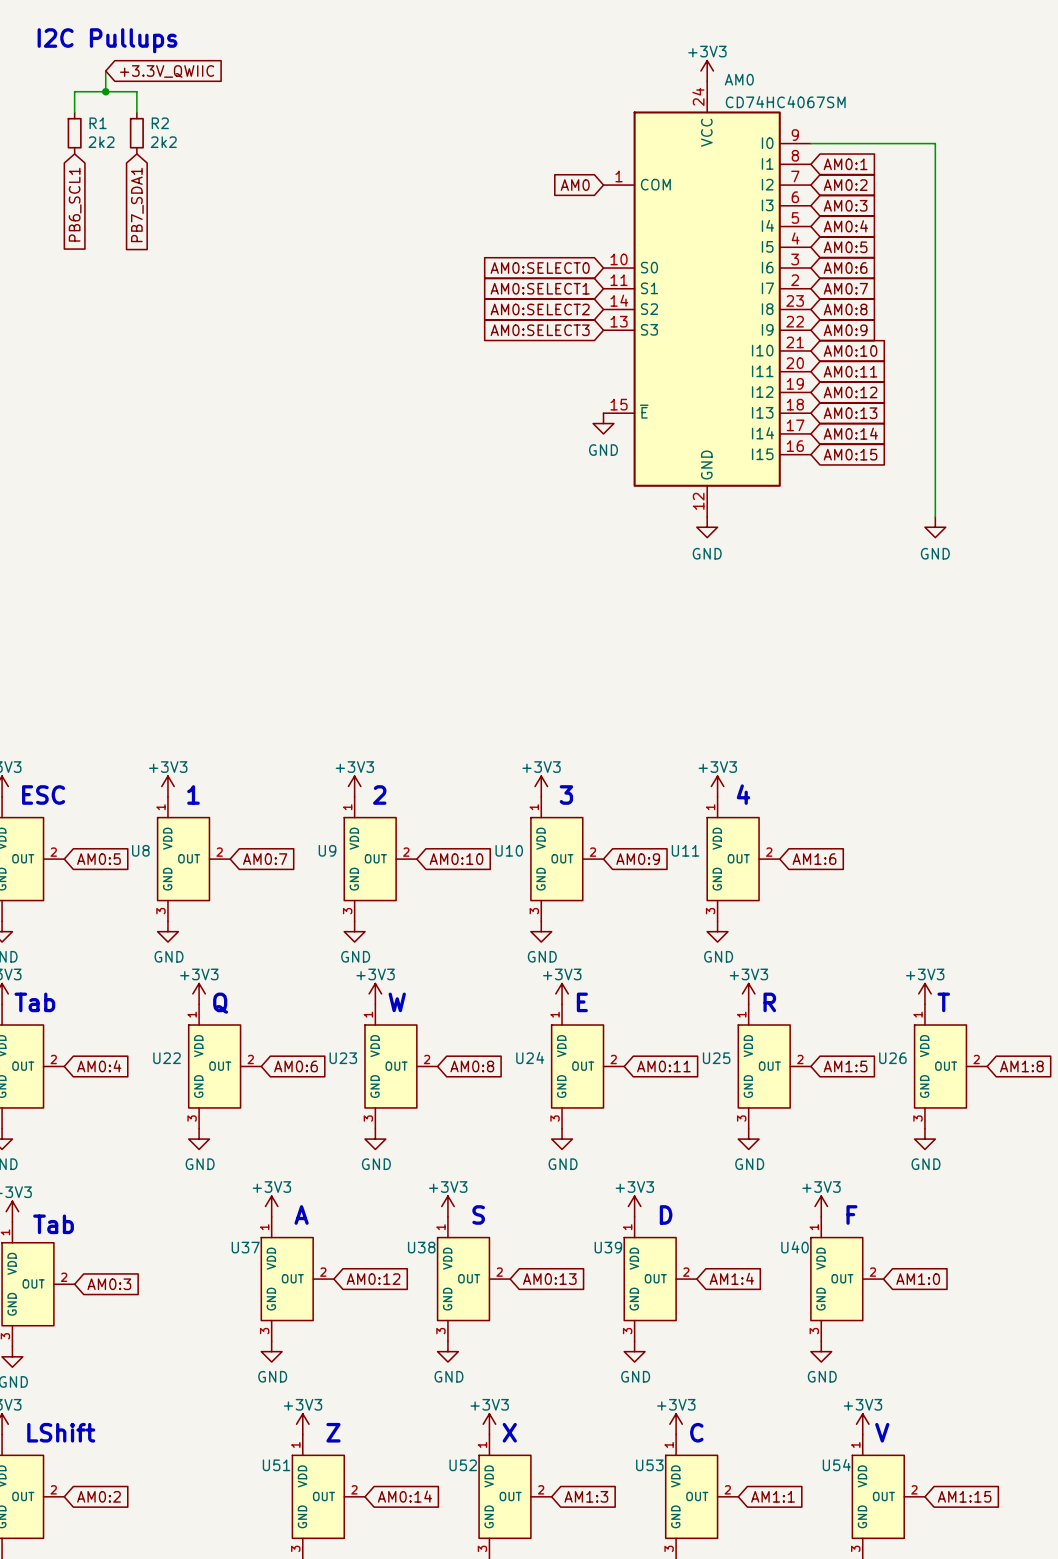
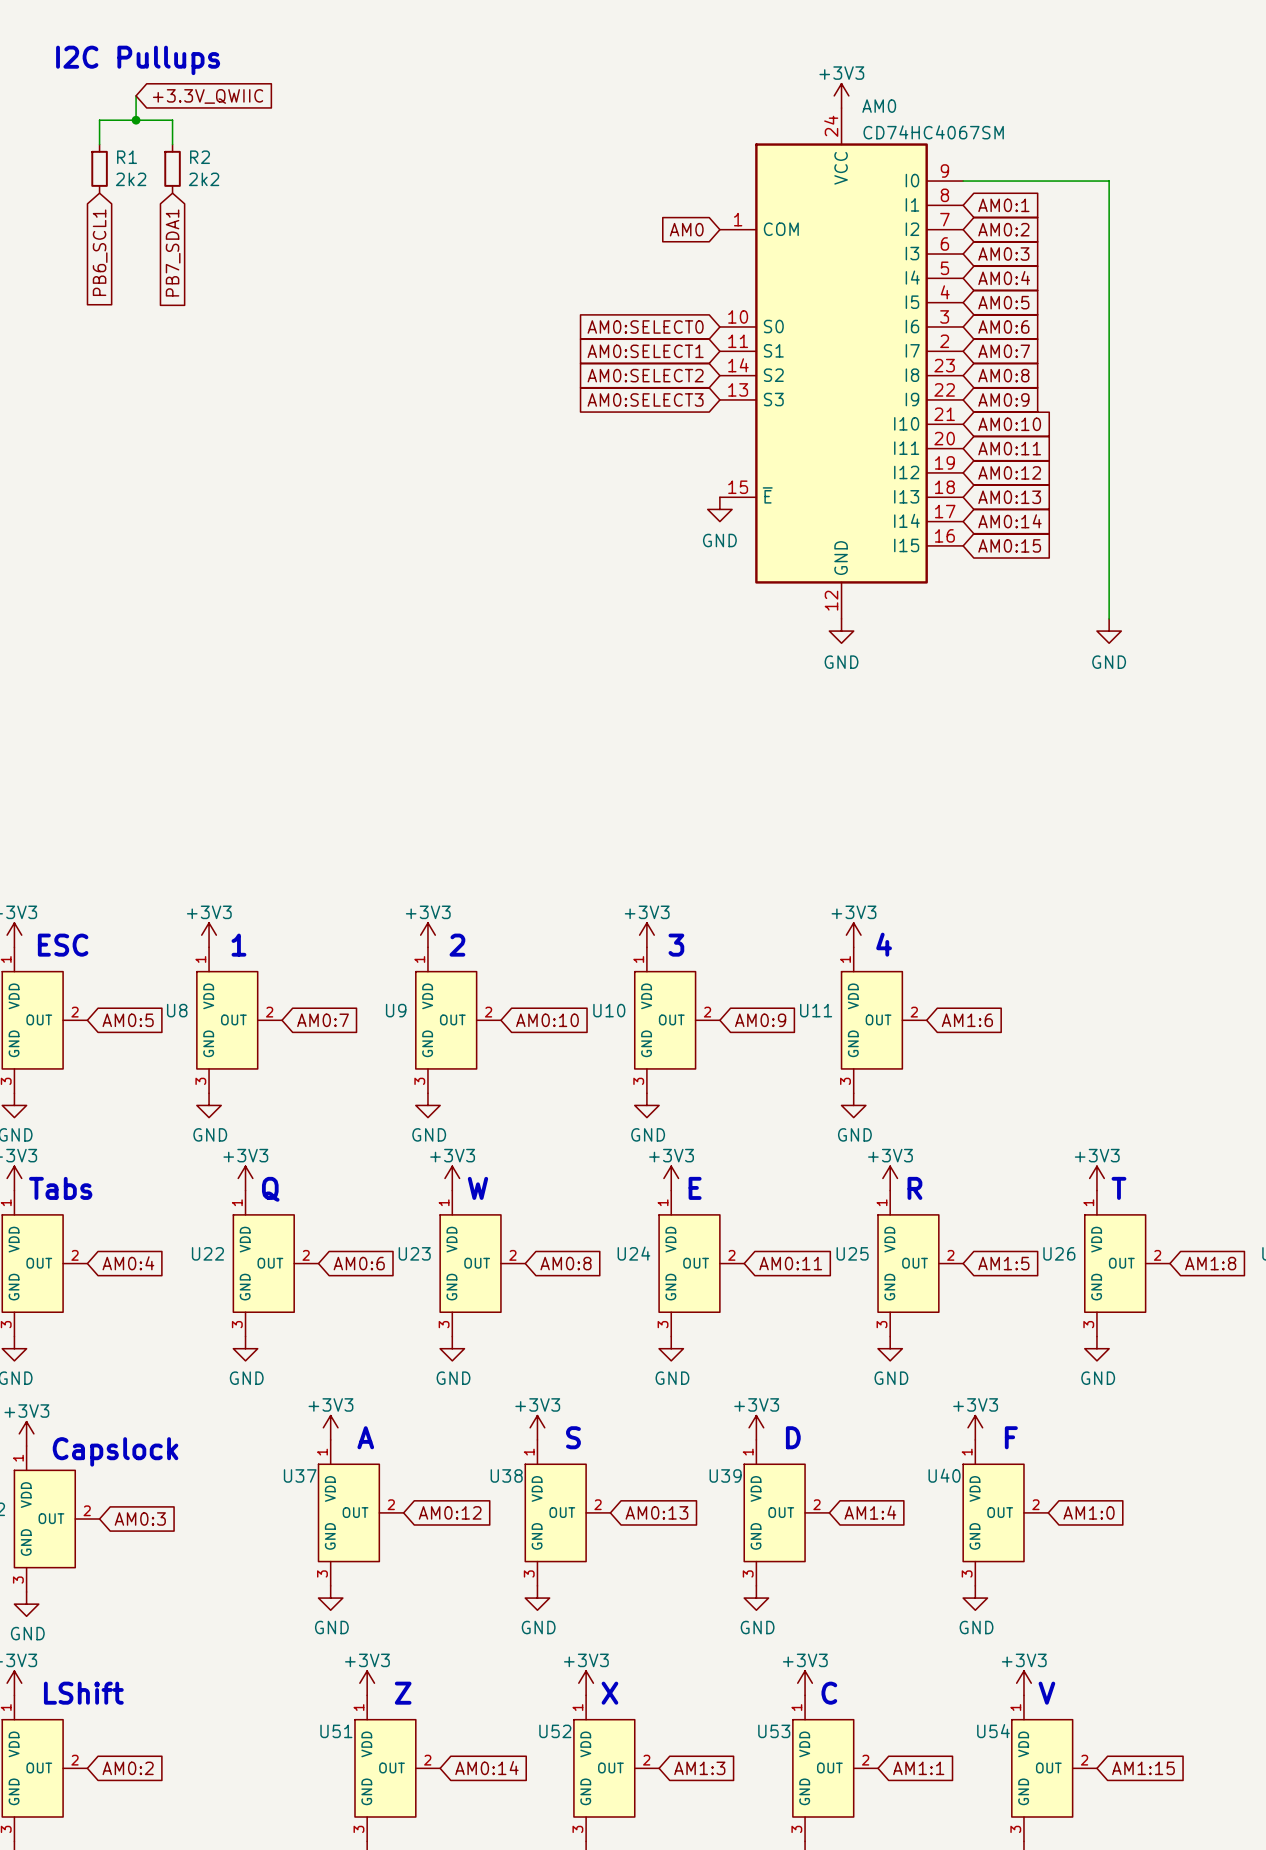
text: Tab (34, 1002) -> Tabs (60, 1188)
text: Tab (53, 1224) -> Capslock (115, 1451)

